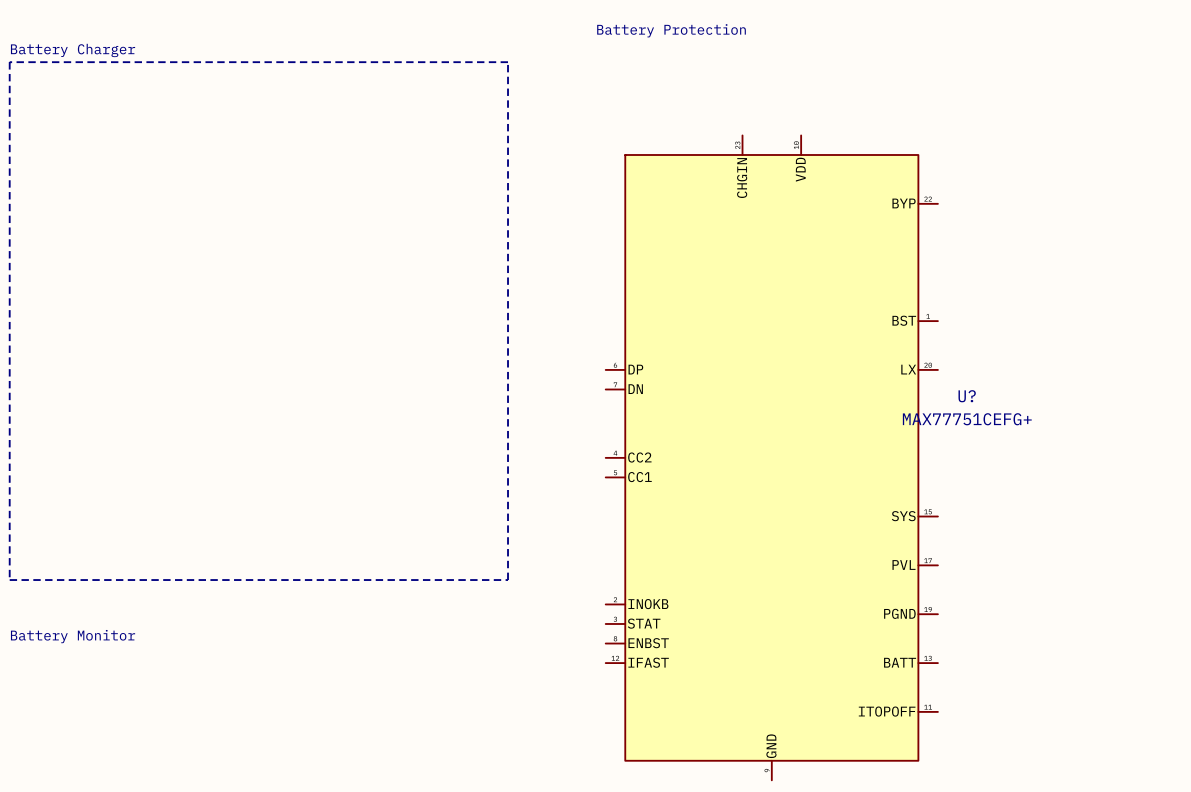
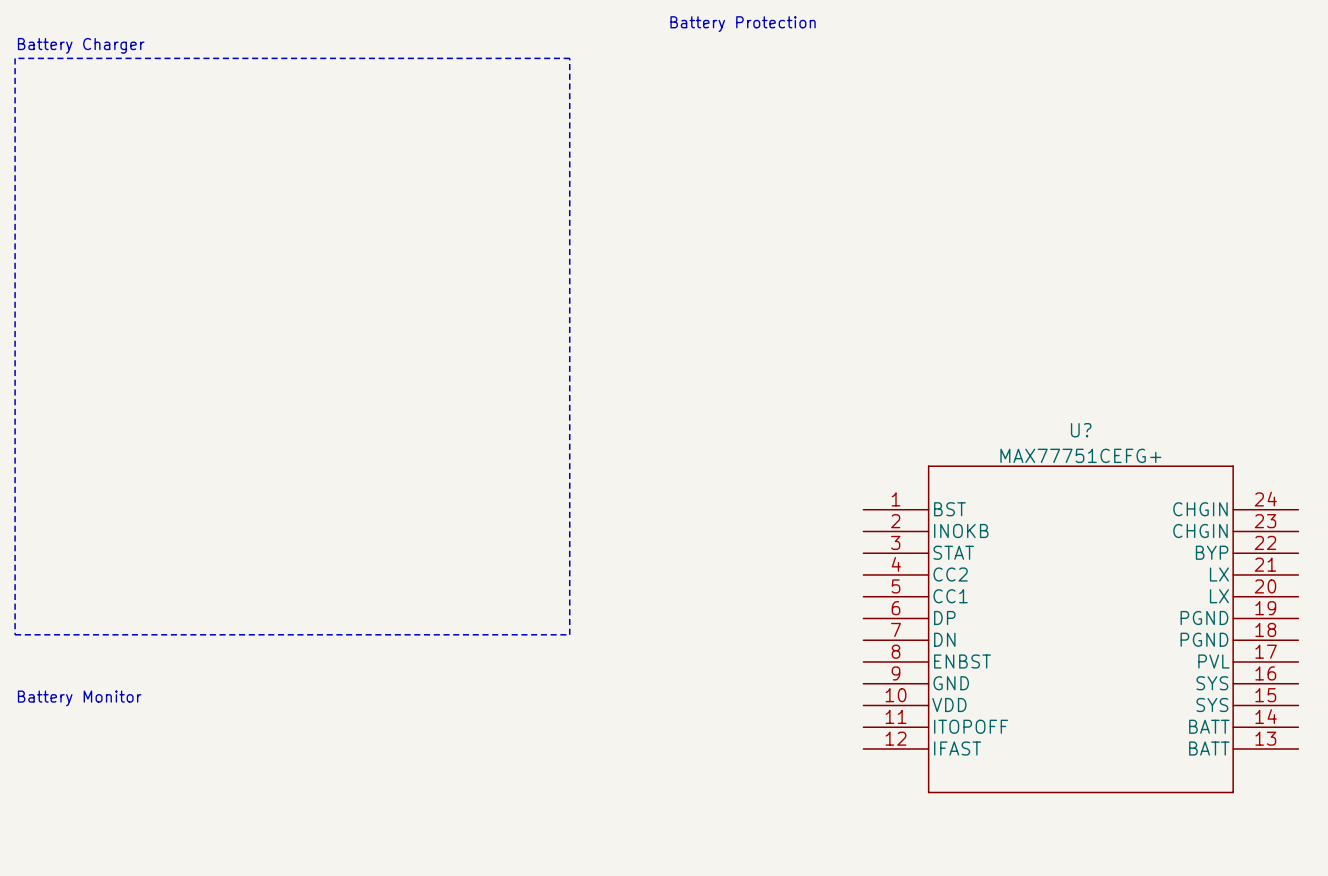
U?: MAX77751CEFG+ (771, 457) -> none
U?: none -> MAX77751CEFG+ (1080, 629)

